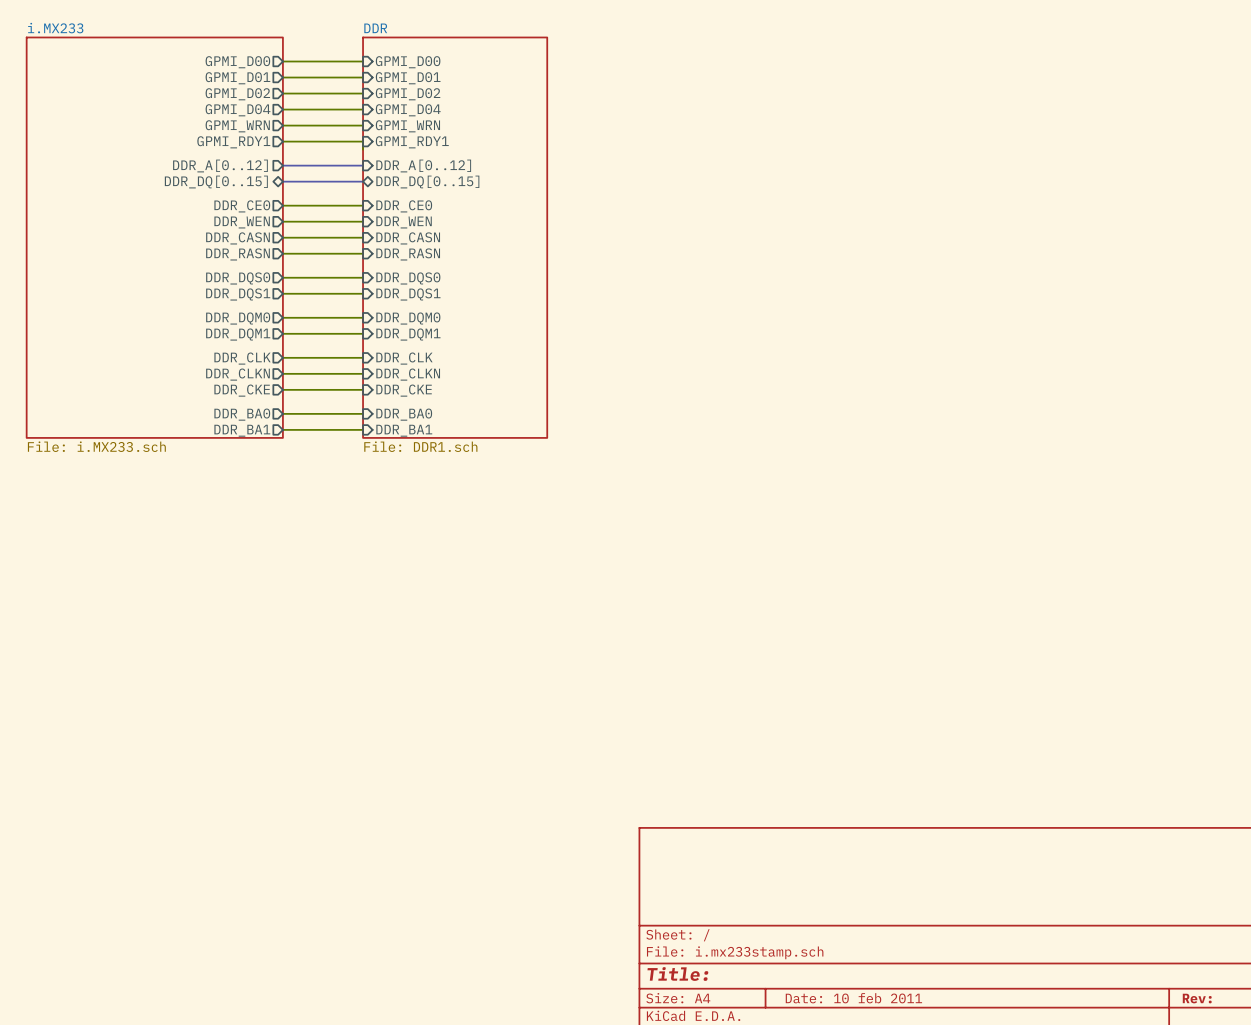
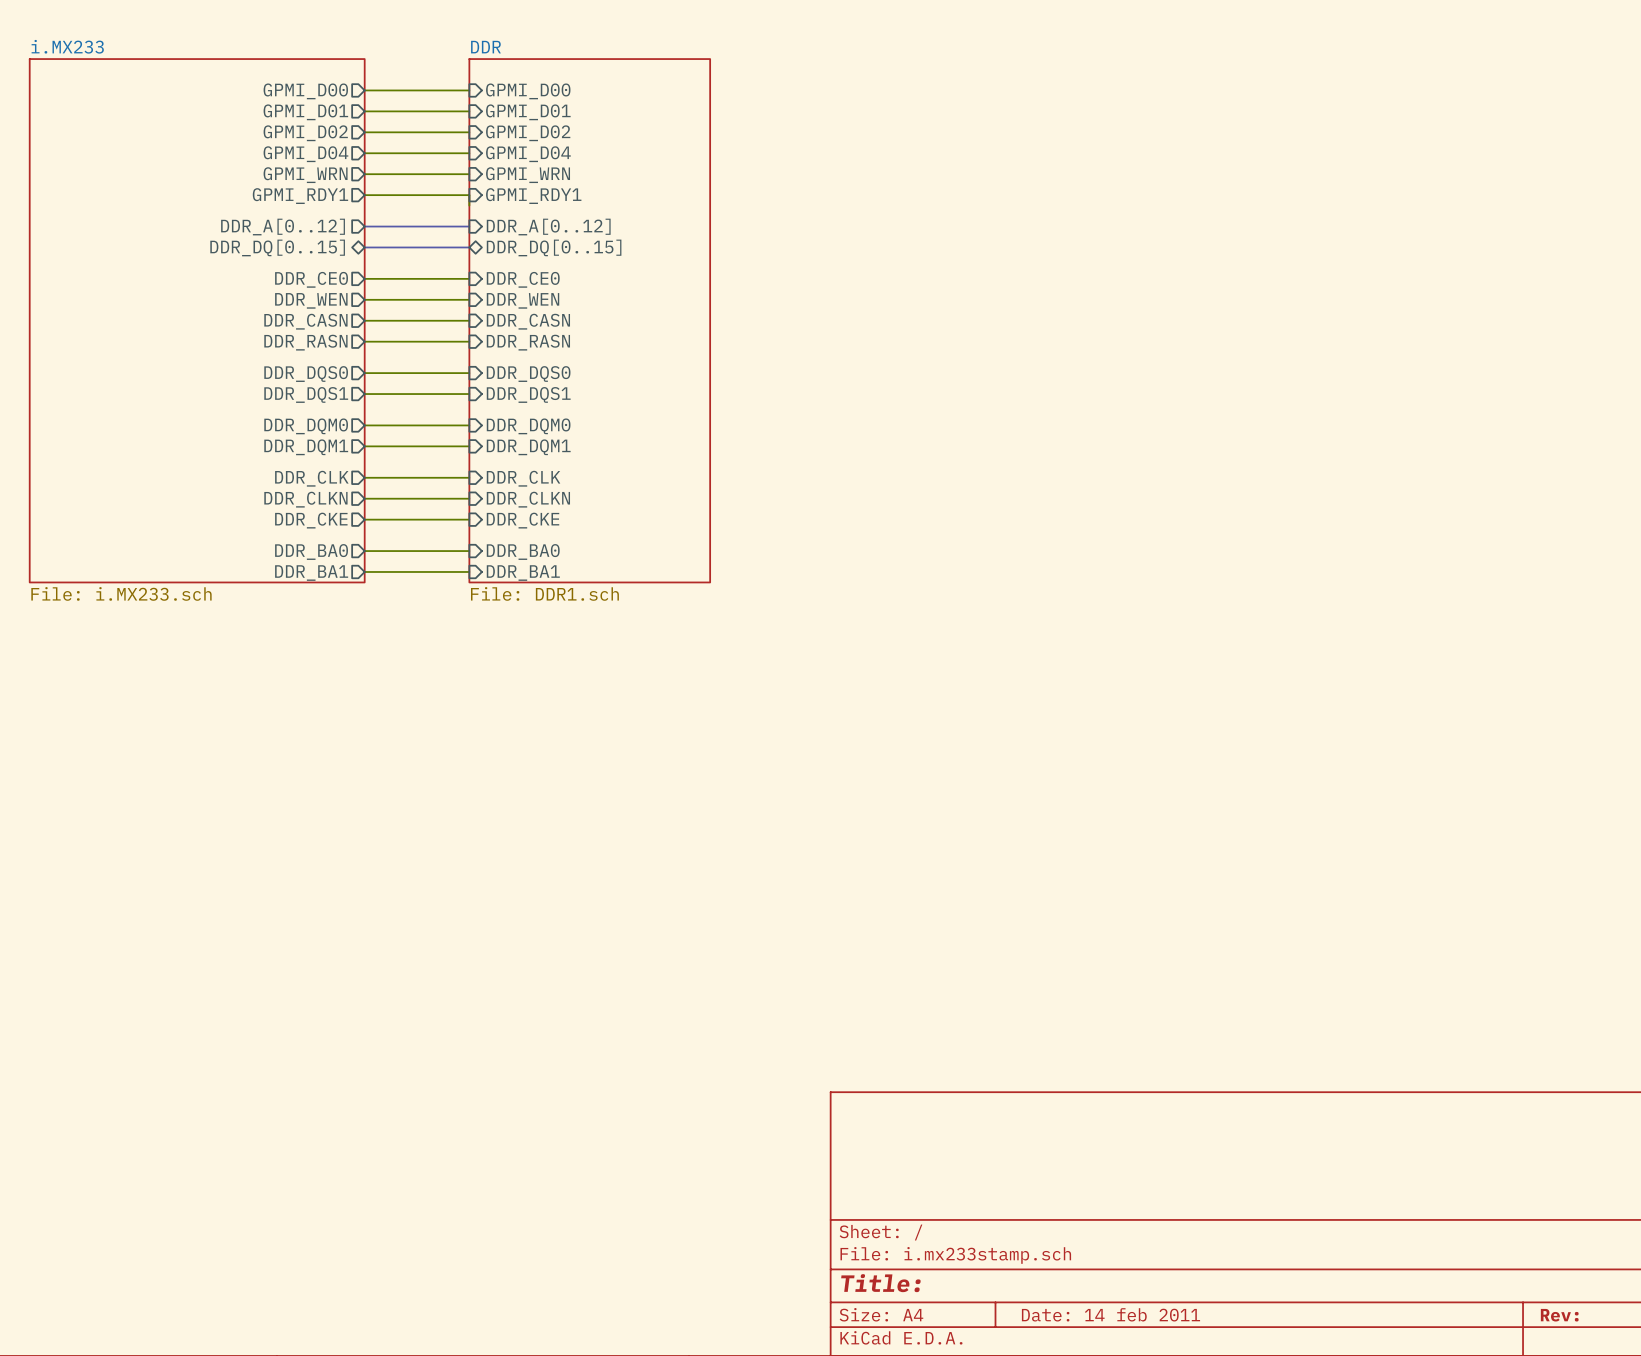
title block: Date: 10 feb 2011 (853, 998) -> Date: 14 feb 2011 (1110, 1314)

